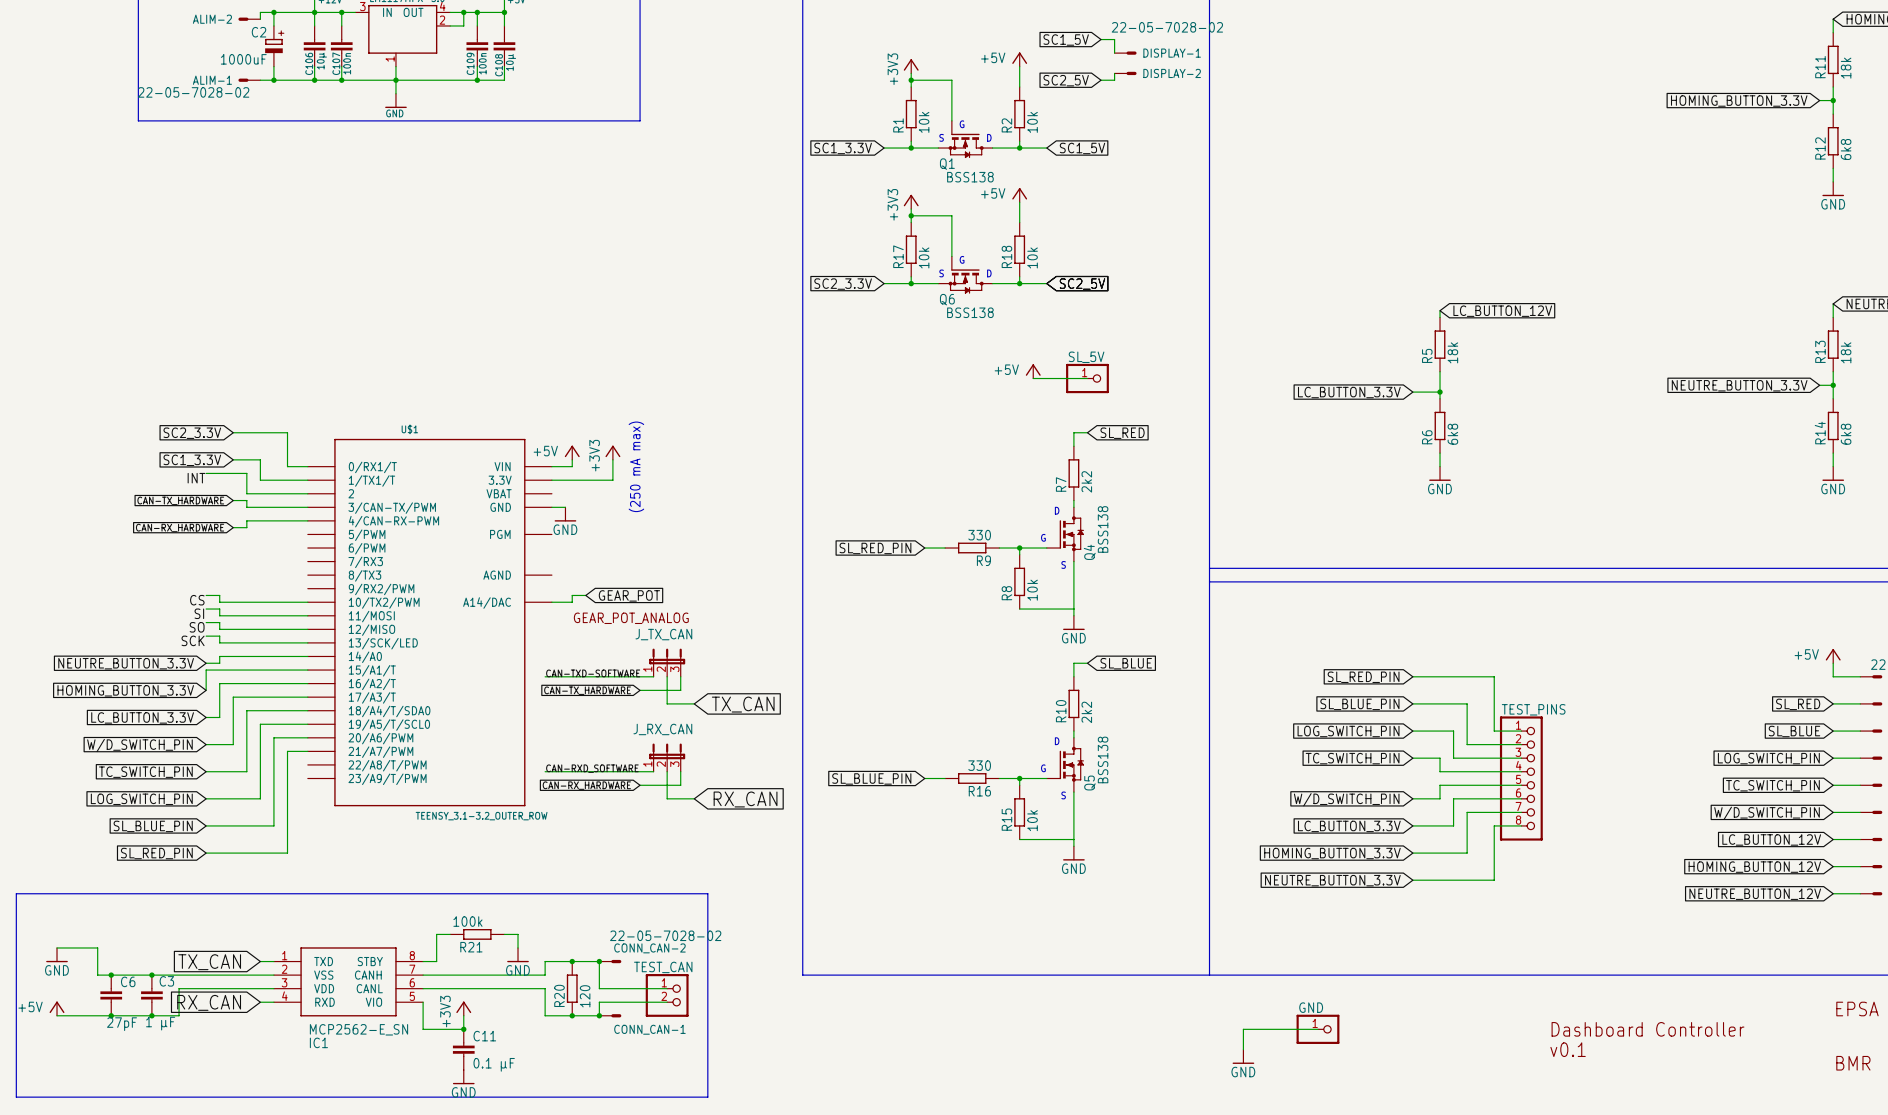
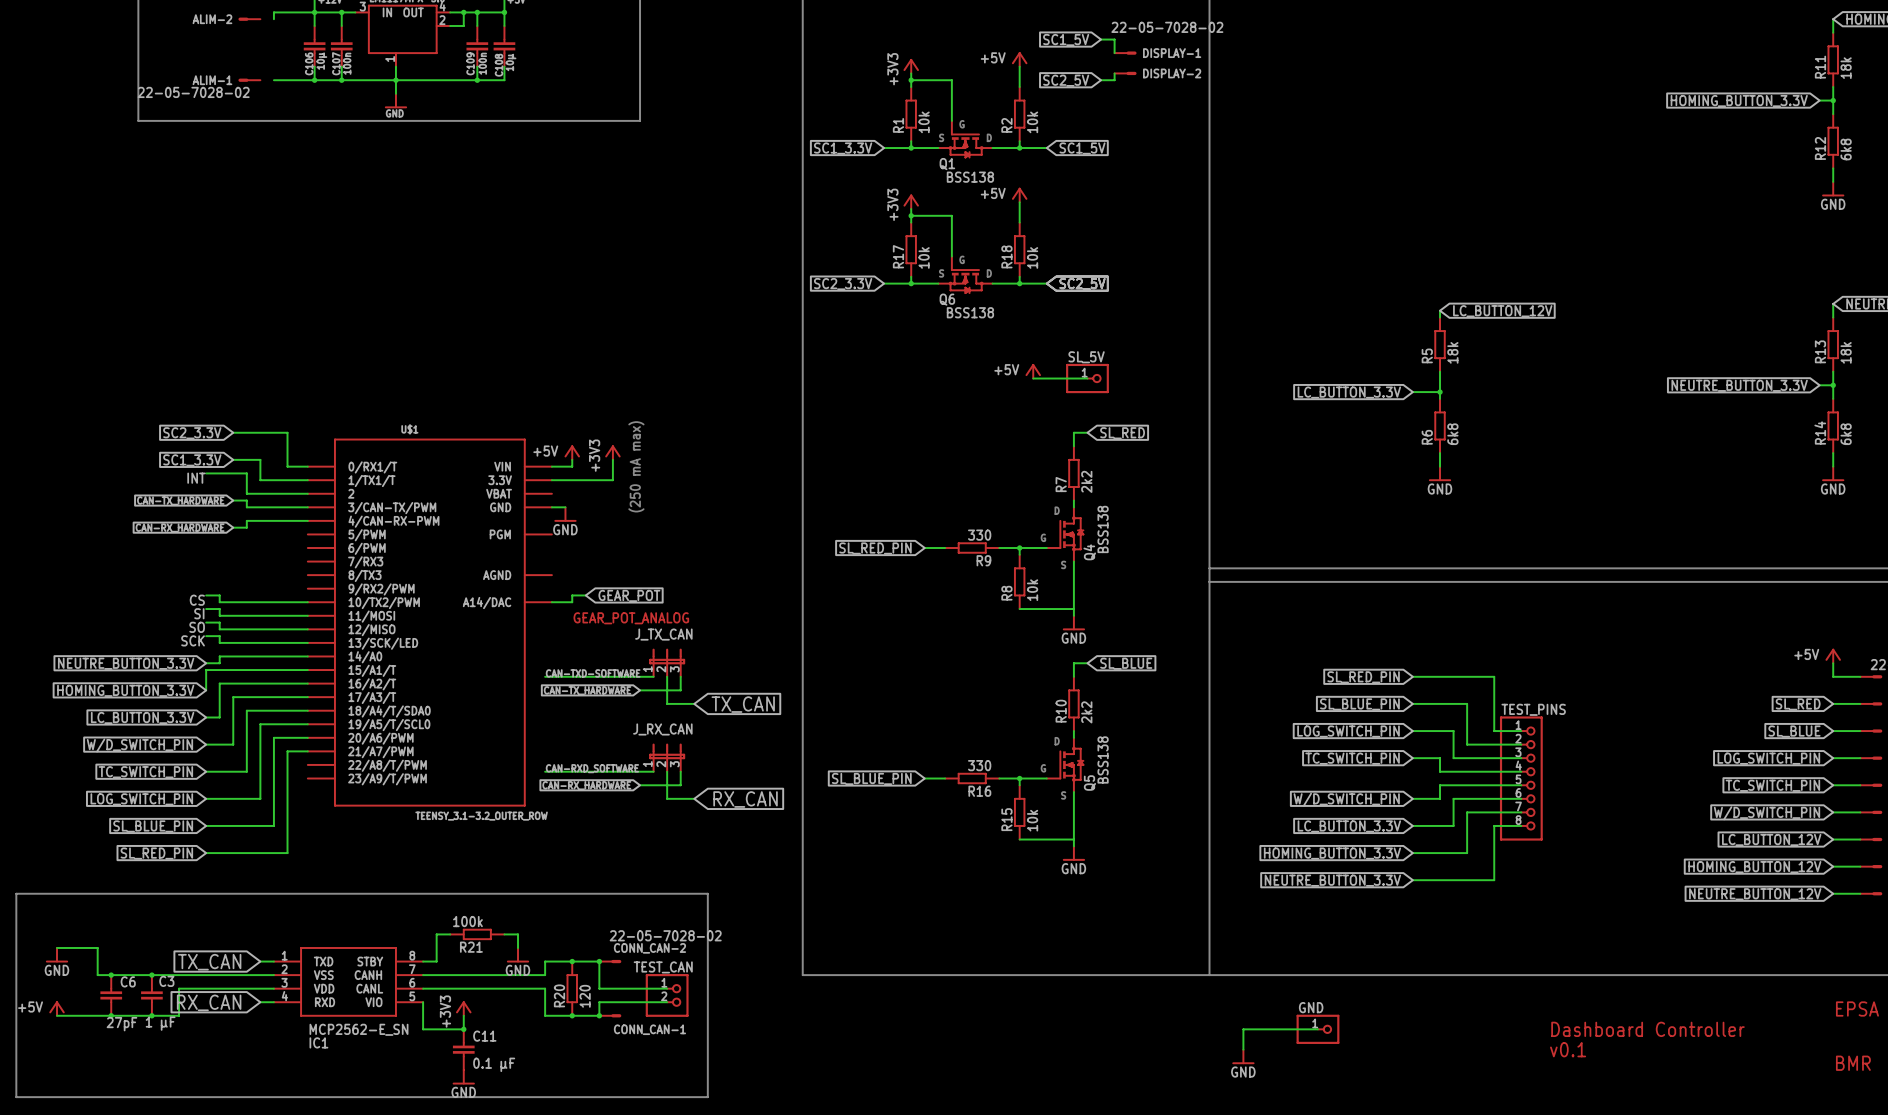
wire: (273, 12) (260, 12) (260, 19) -> none
junction: (273, 12) -> none
wire: (273, 19) (273, 25) -> none
C2: 1000uF (273, 46) -> none
wire: (273, 66) (273, 80) (260, 80) -> none
junction: (273, 80) -> none

